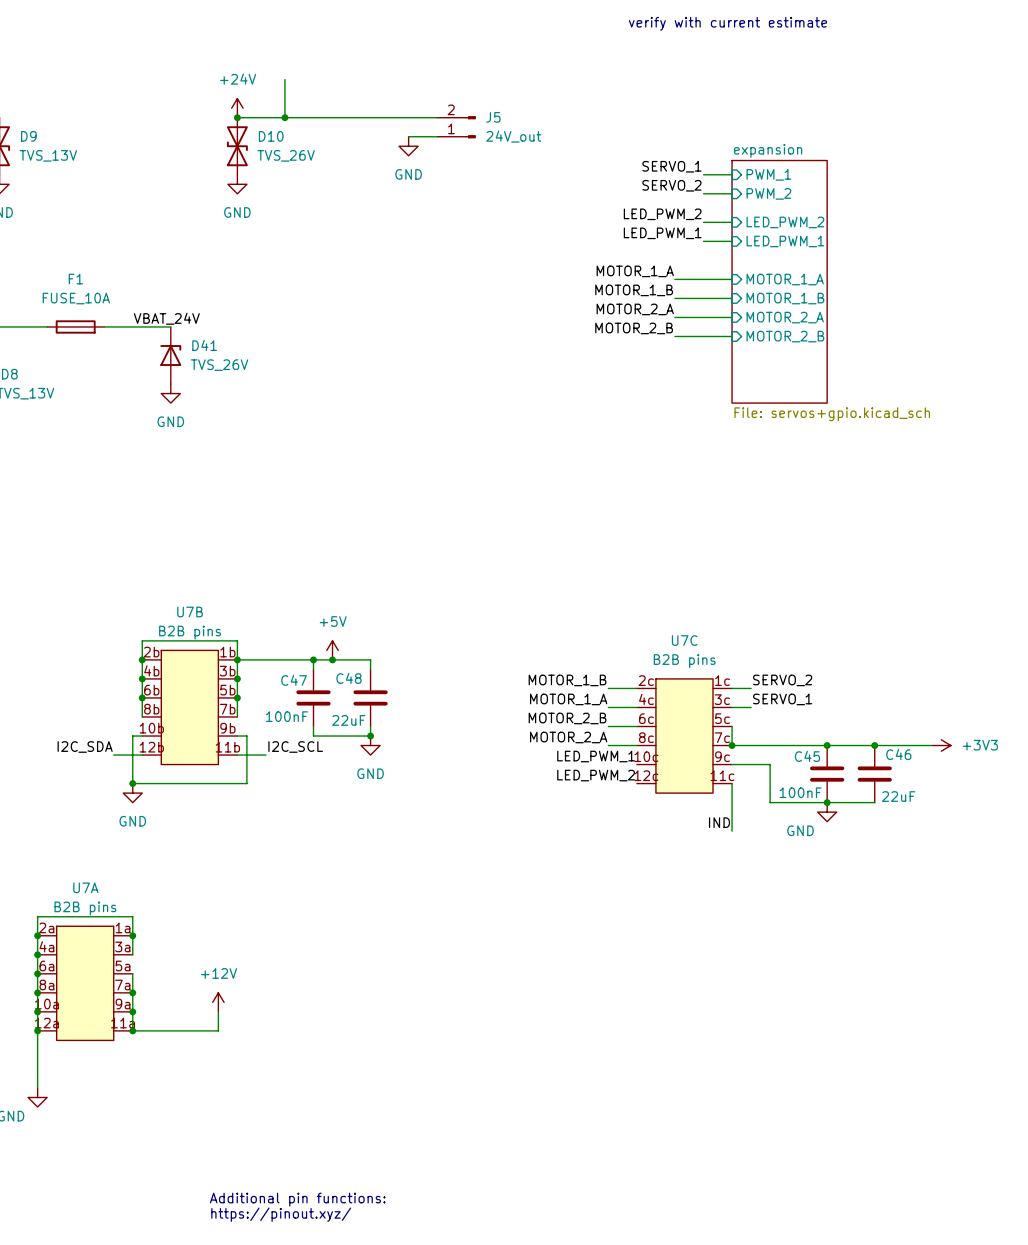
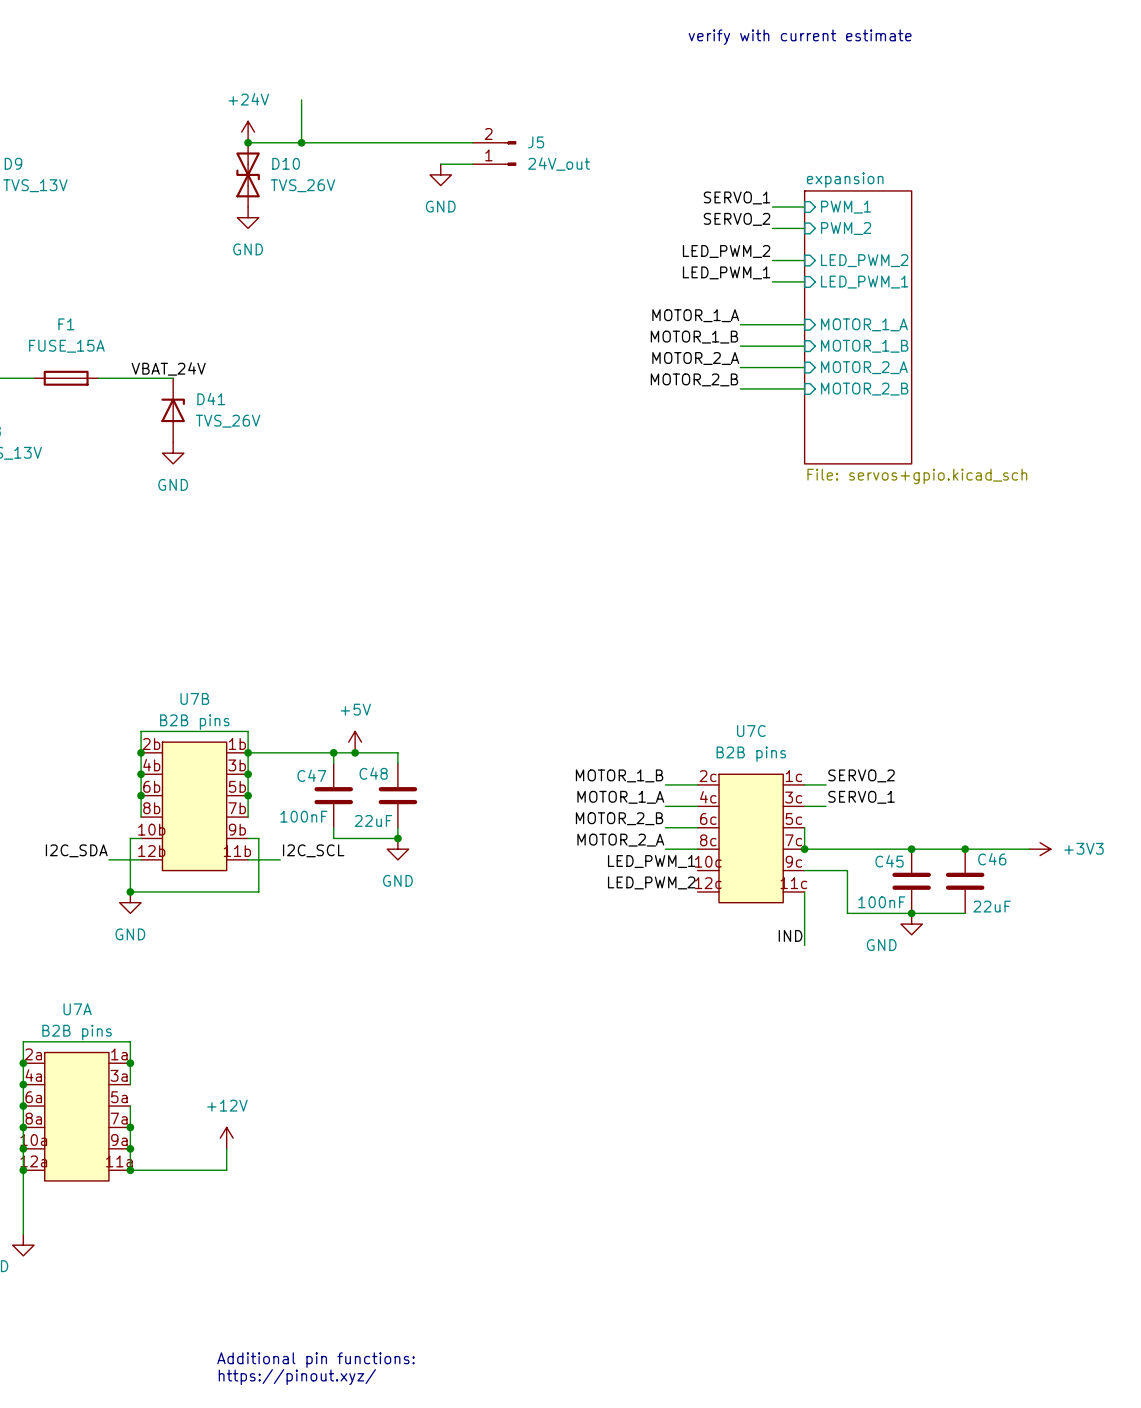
F1 value: FUSE_10A (76, 298) -> FUSE_15A (66, 346)

